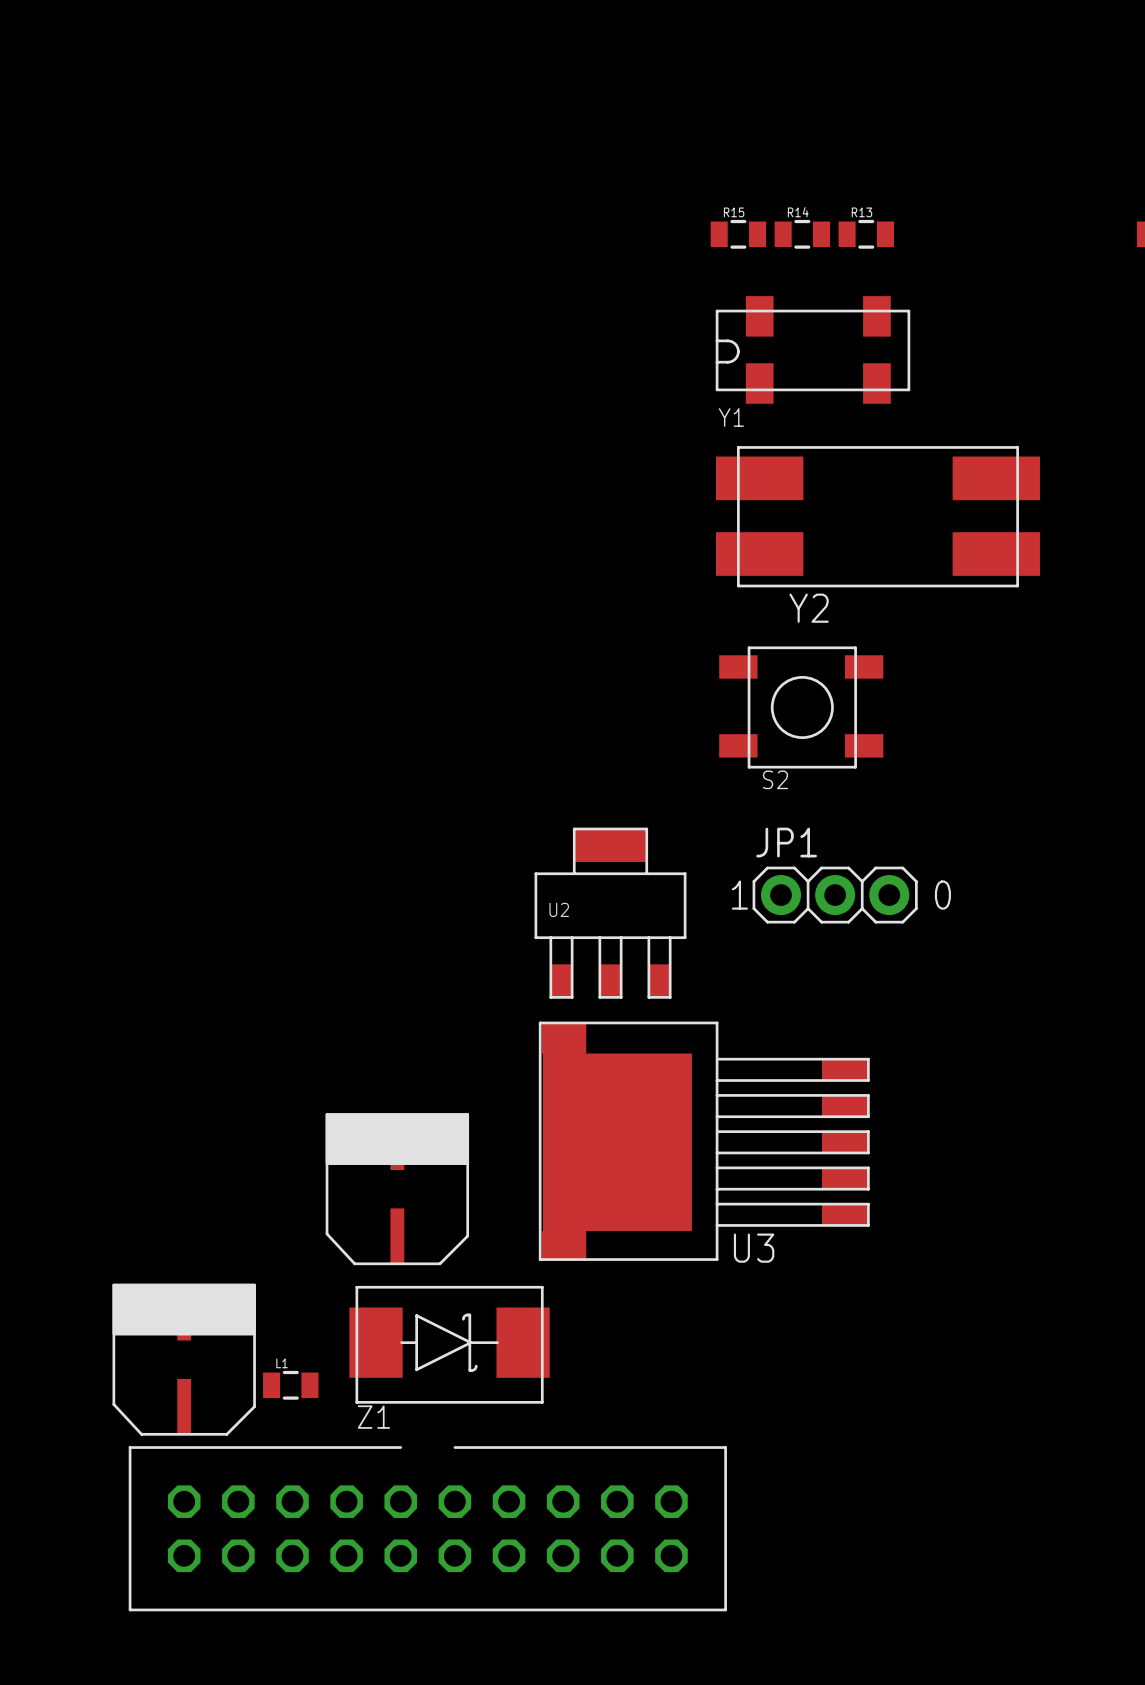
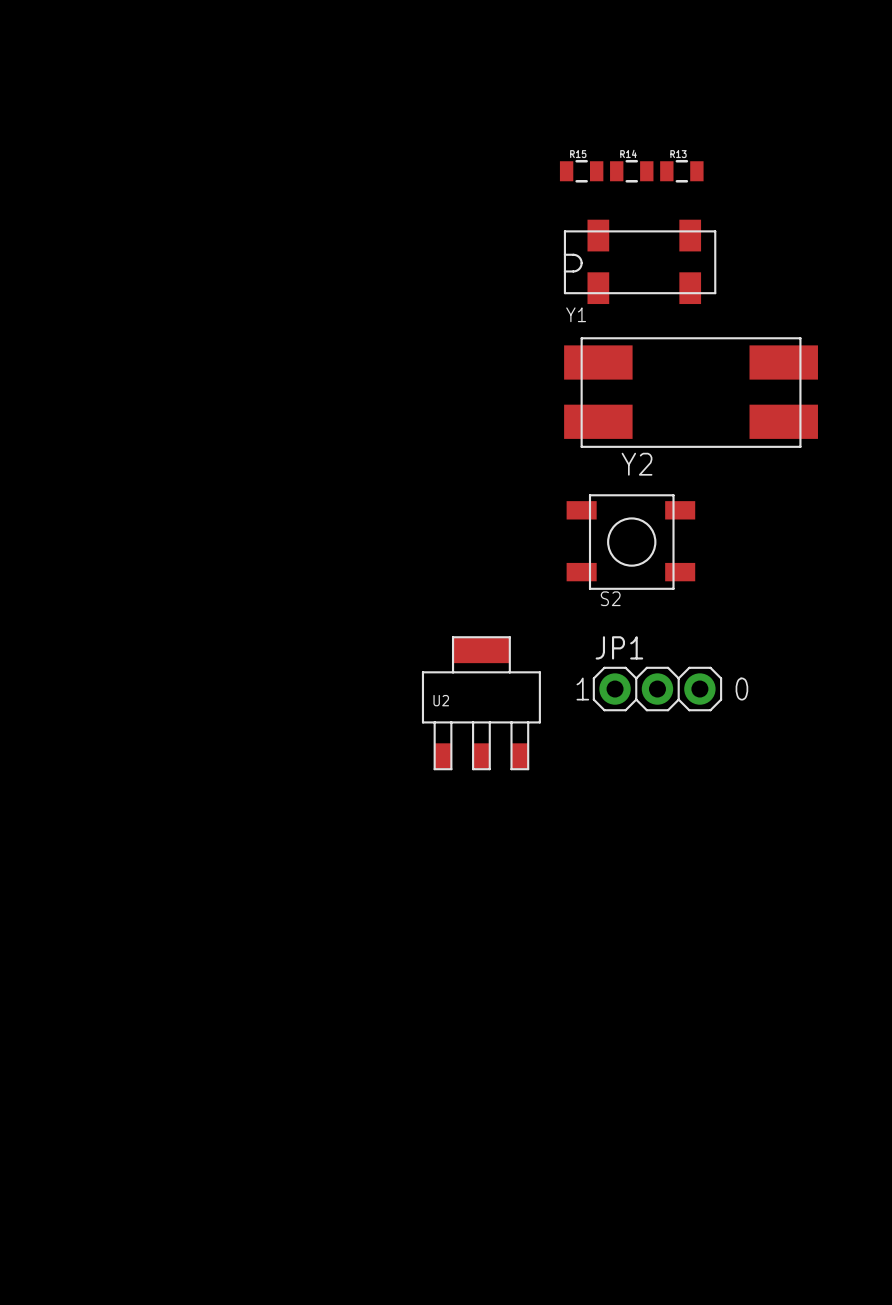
U3: (704, 1141) -> none
part: (397, 1189) -> none
Z1: (449, 1344) -> none
part: (184, 1359) -> none
L1: (290, 1385) -> none
part: (427, 1528) -> none

